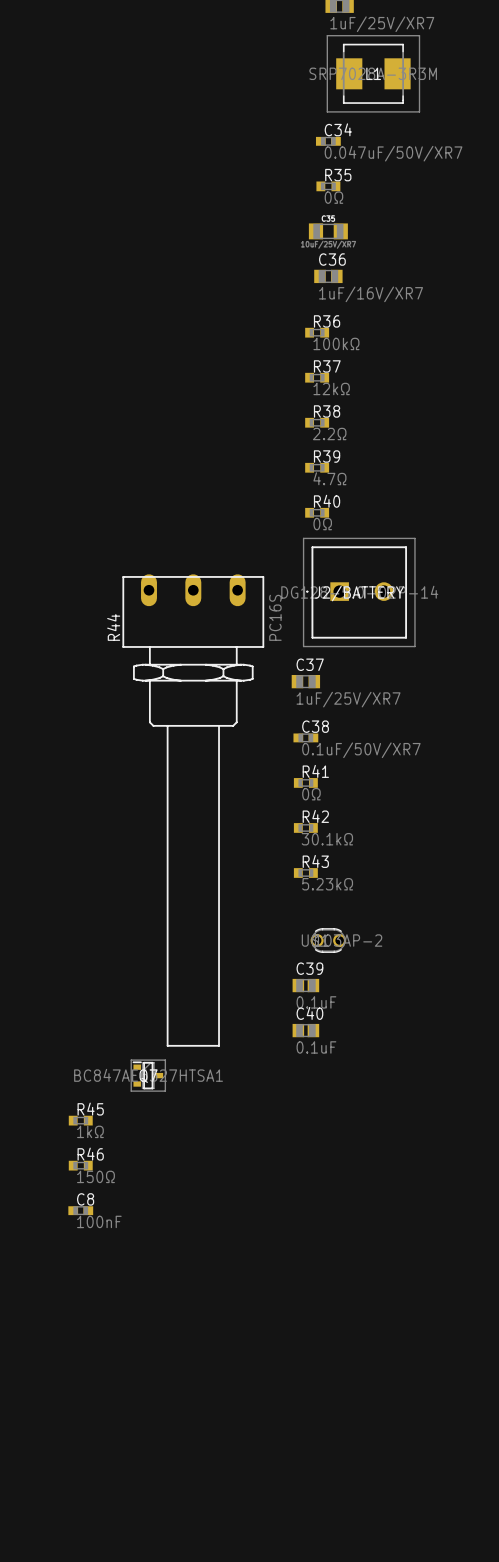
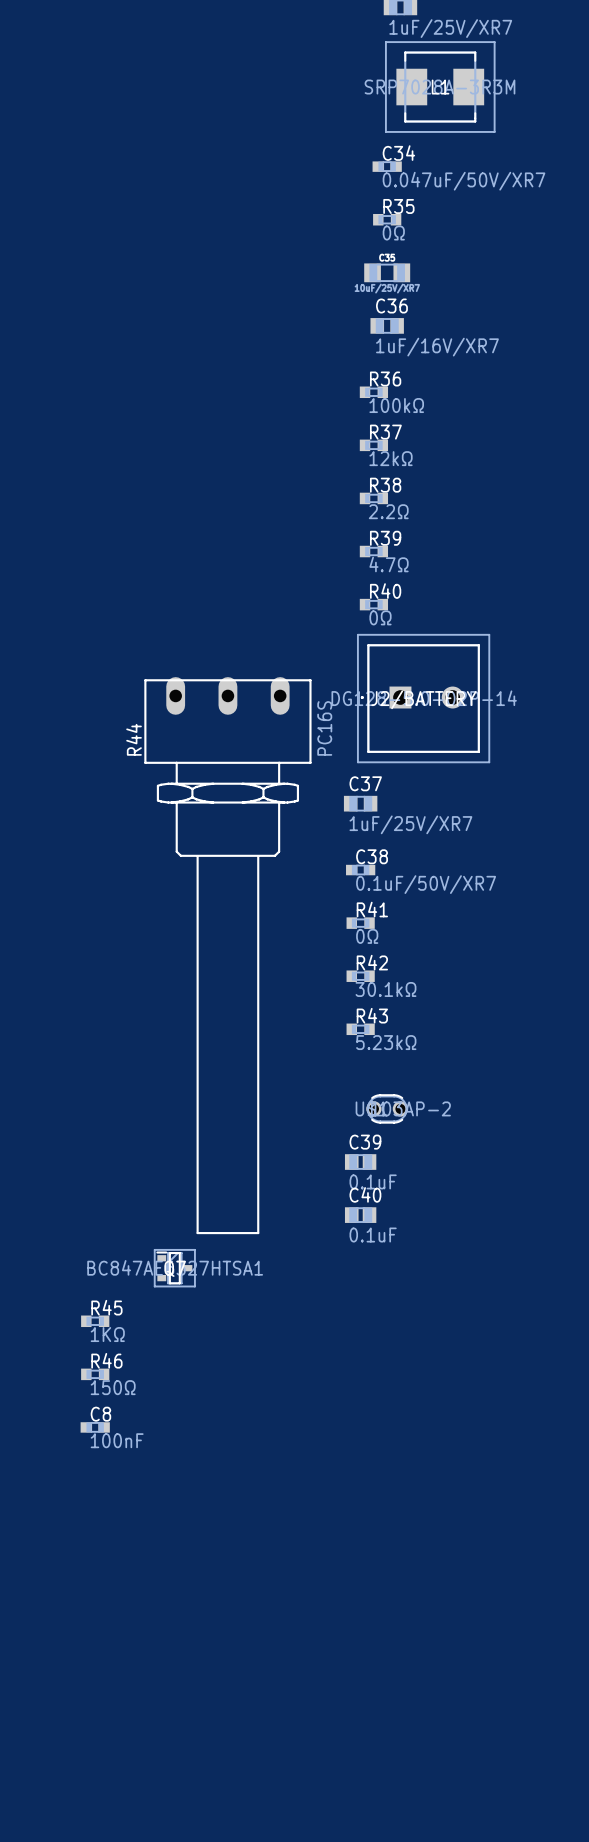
R45 value: 1kΩ (90, 1131) -> 1KΩ (107, 1334)

